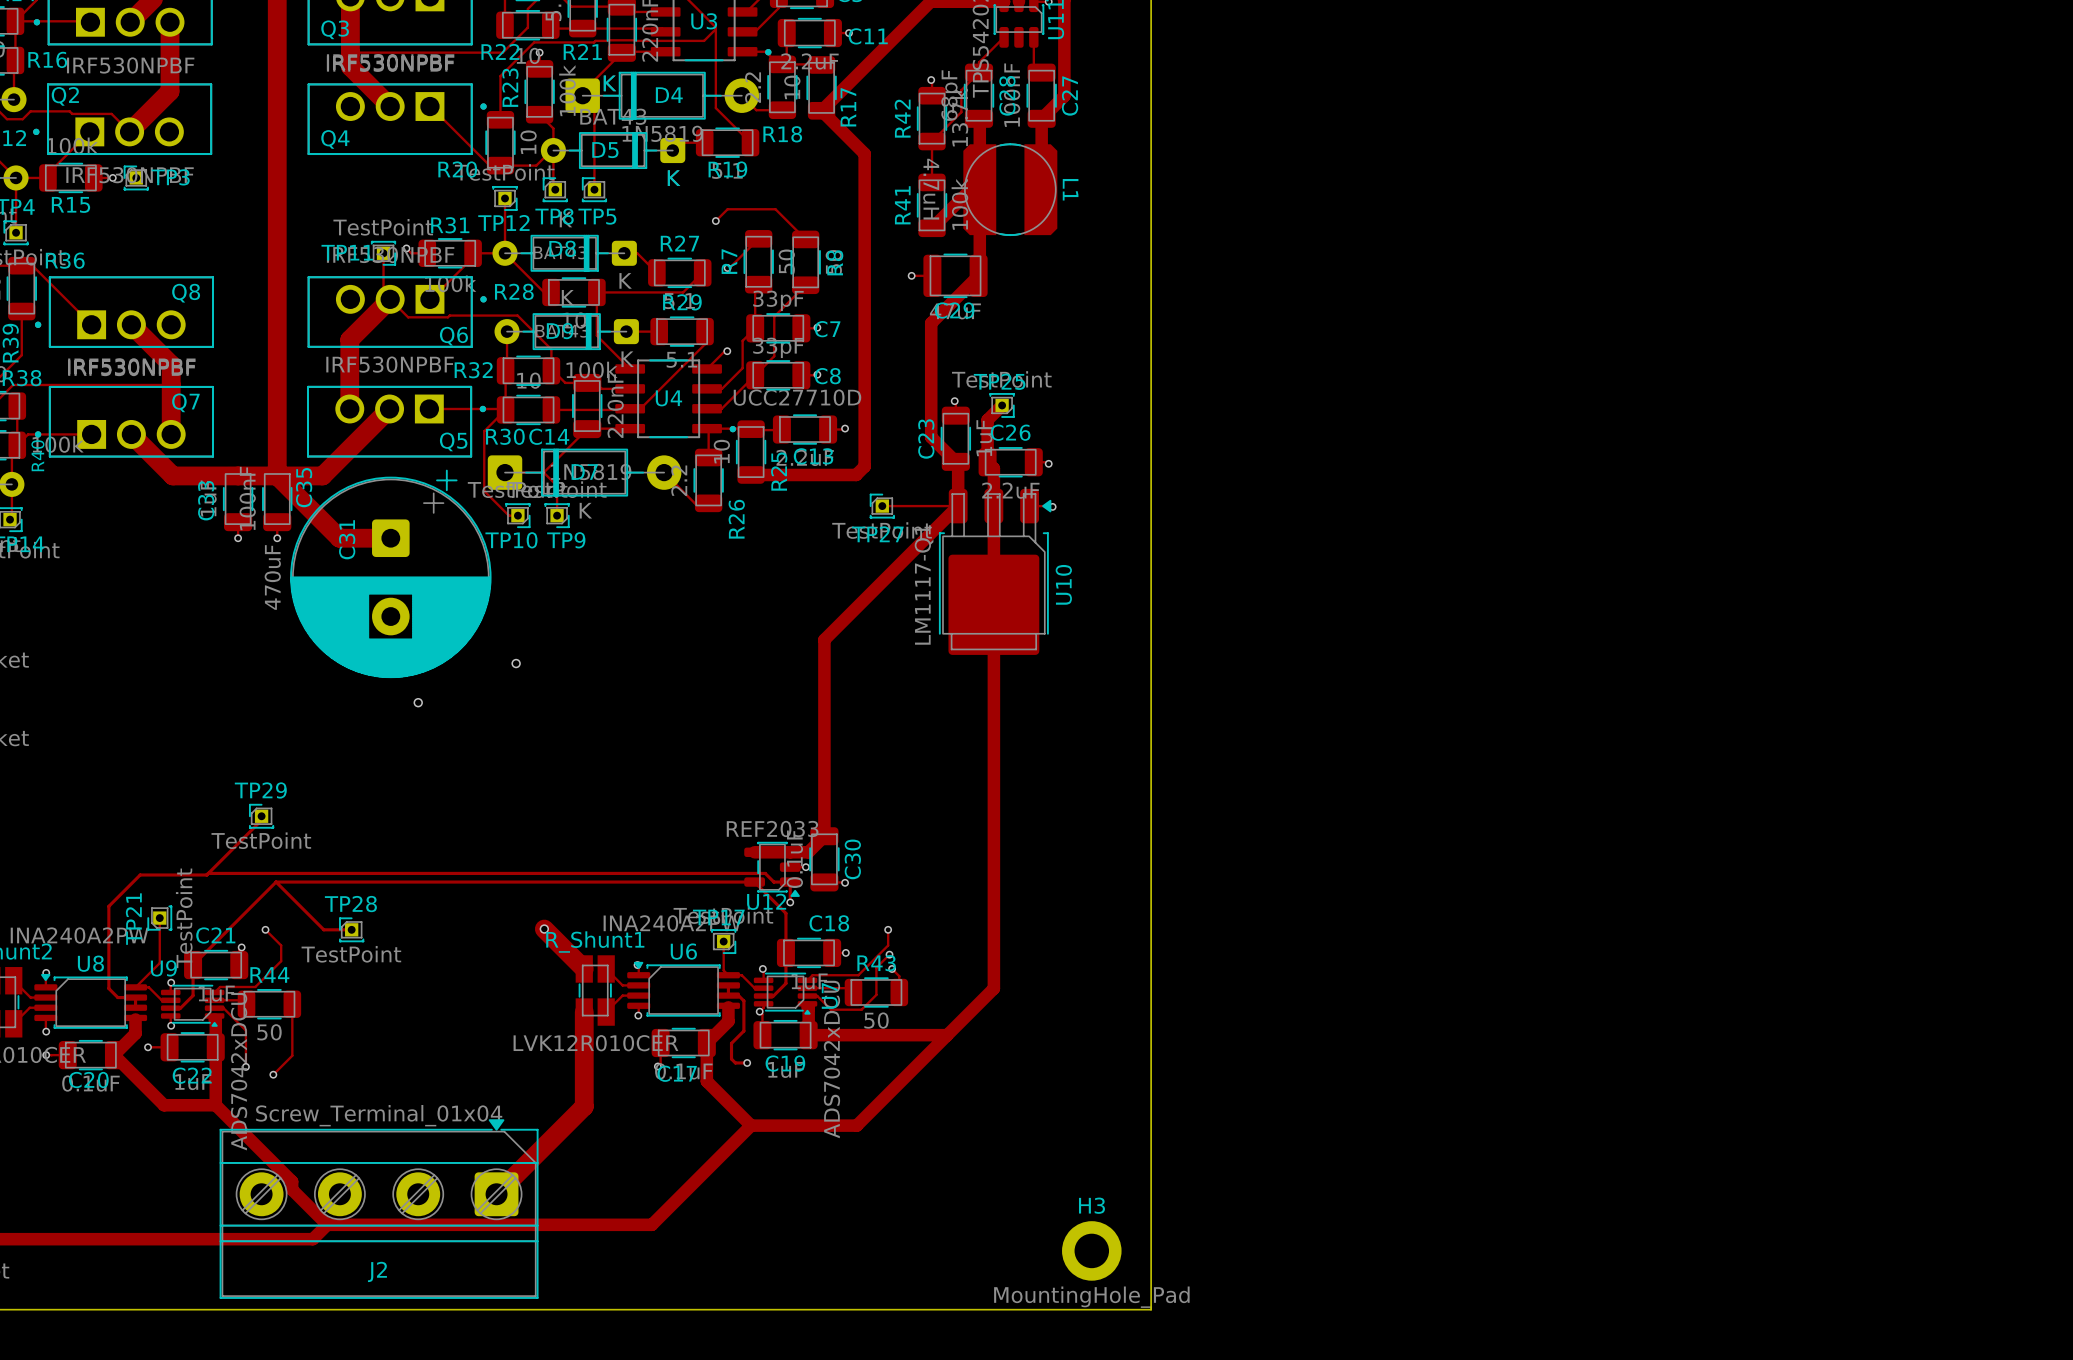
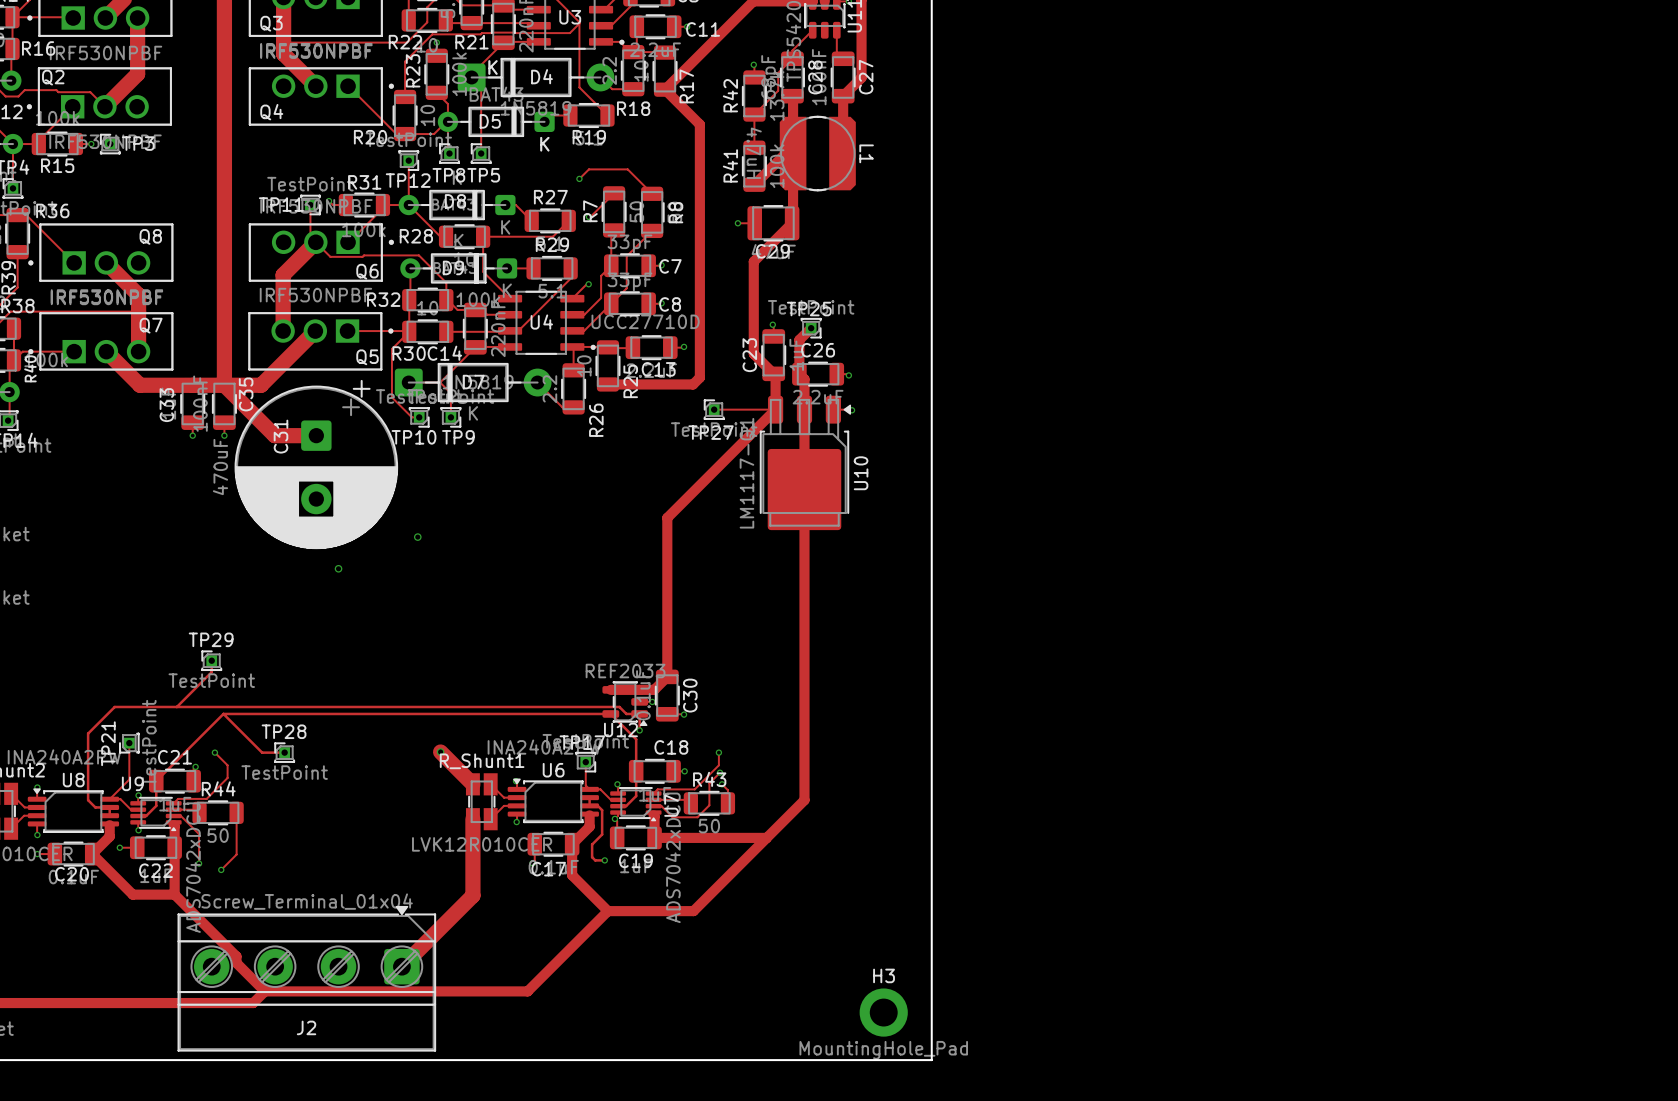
track: (261, 820) (206, 875) (140, 875) -> (168, 706) (113, 708)
track: none -> (211, 663) (211, 672) (176, 706)

